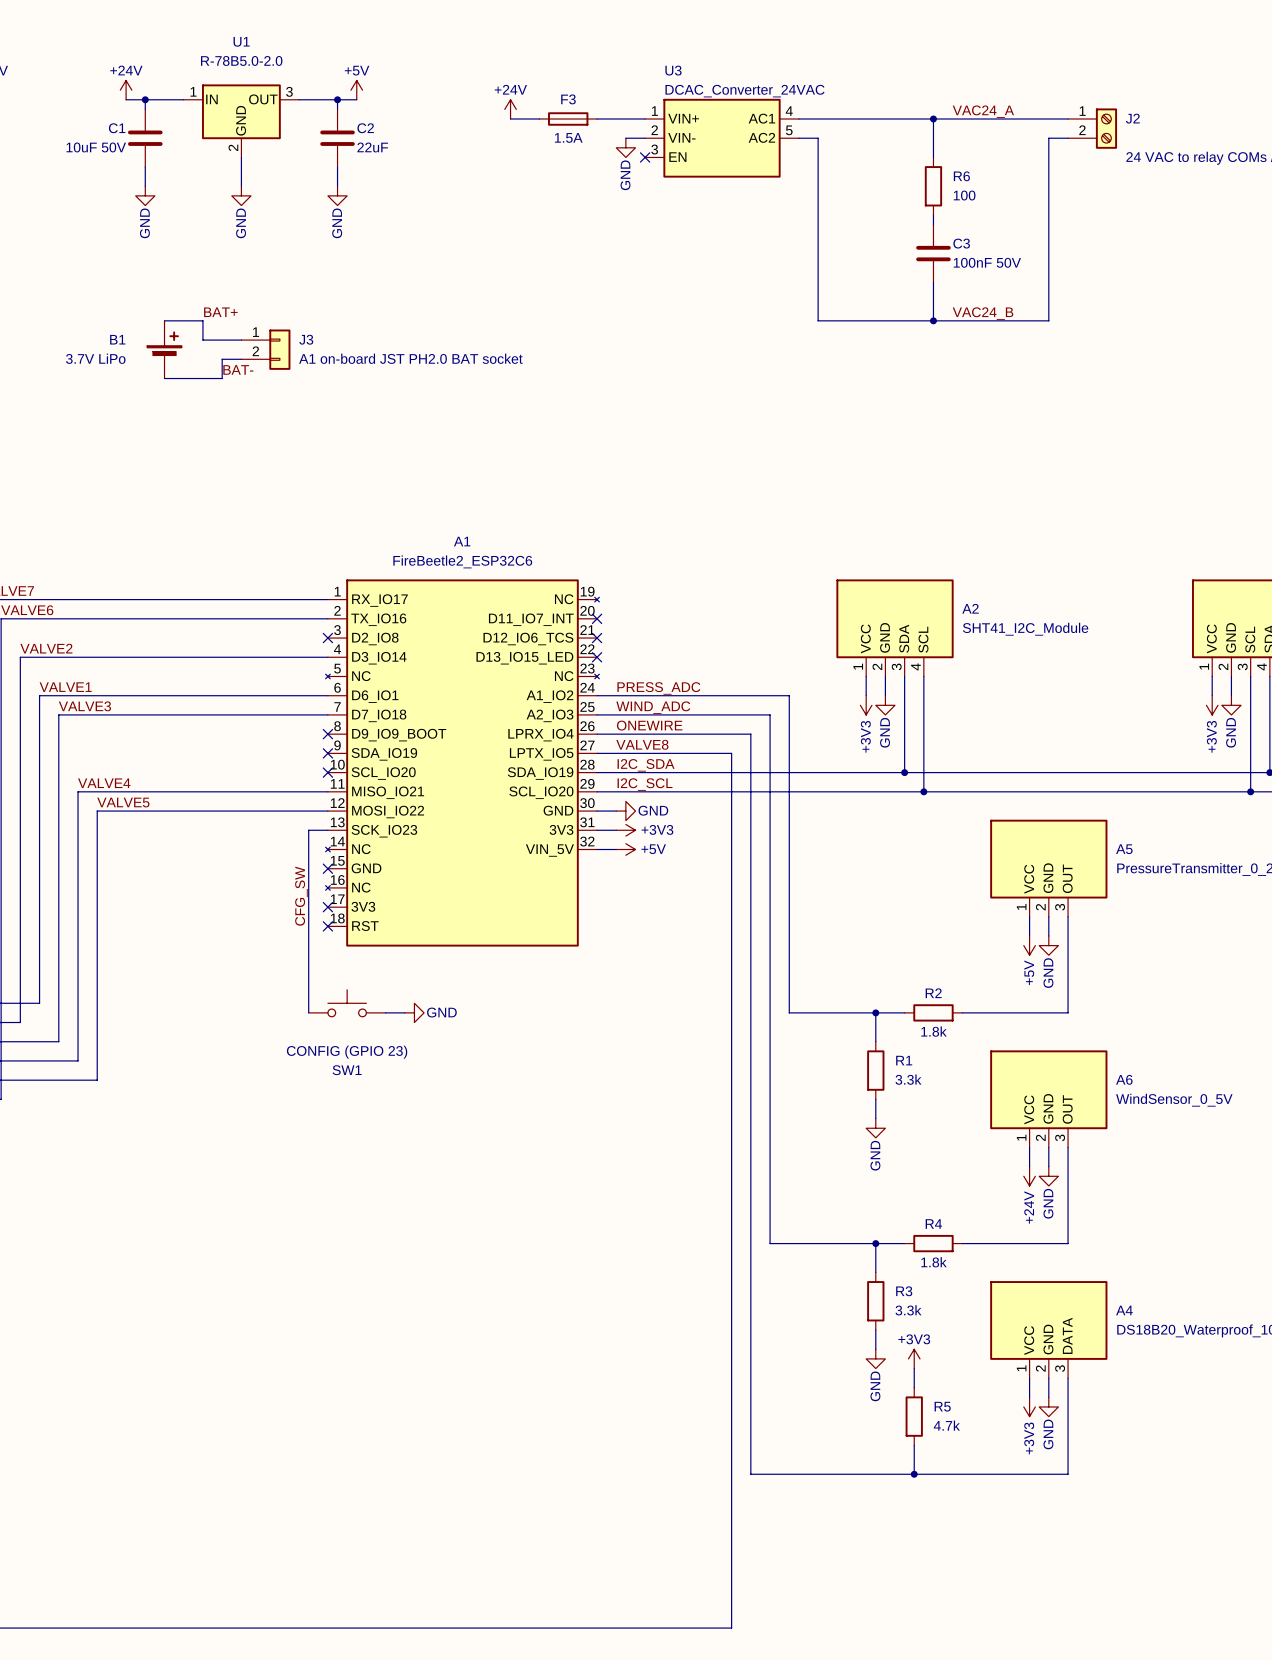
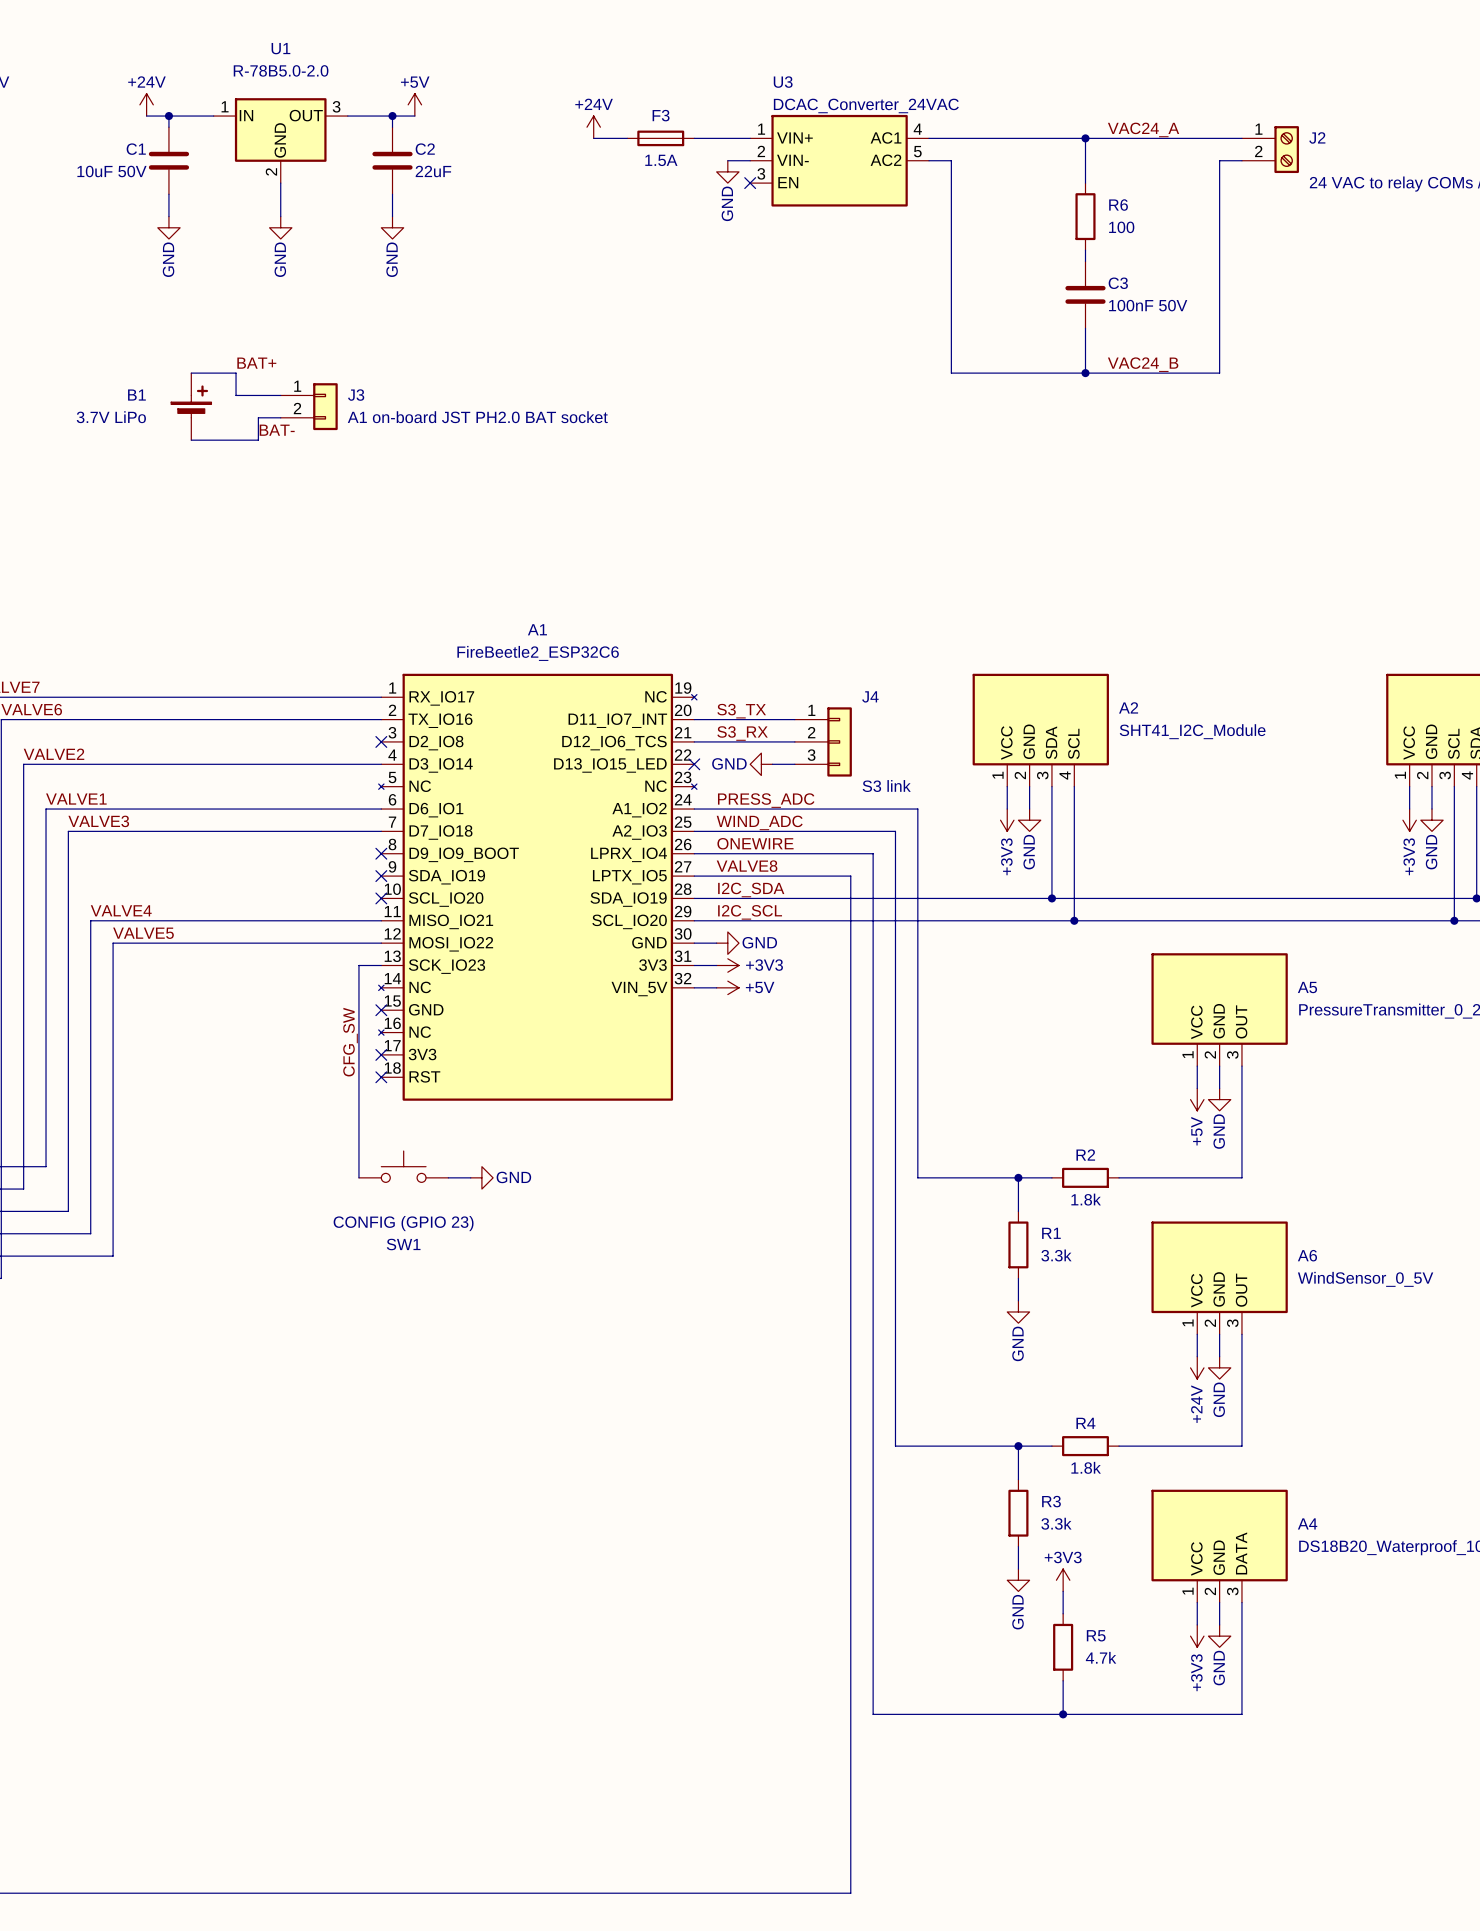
label: none -> S3_TX (741, 711)
wire: none -> (694, 719) (794, 719)
no-connect mark: (597, 618) -> none
label: none -> S3_RX (742, 733)
wire: none -> (694, 741) (794, 741)
no-connect mark: (597, 638) -> none
J4: none -> S3 link (823, 741)
power symbol: none -> GND (761, 764)
wire: none -> (772, 764) (794, 764)

